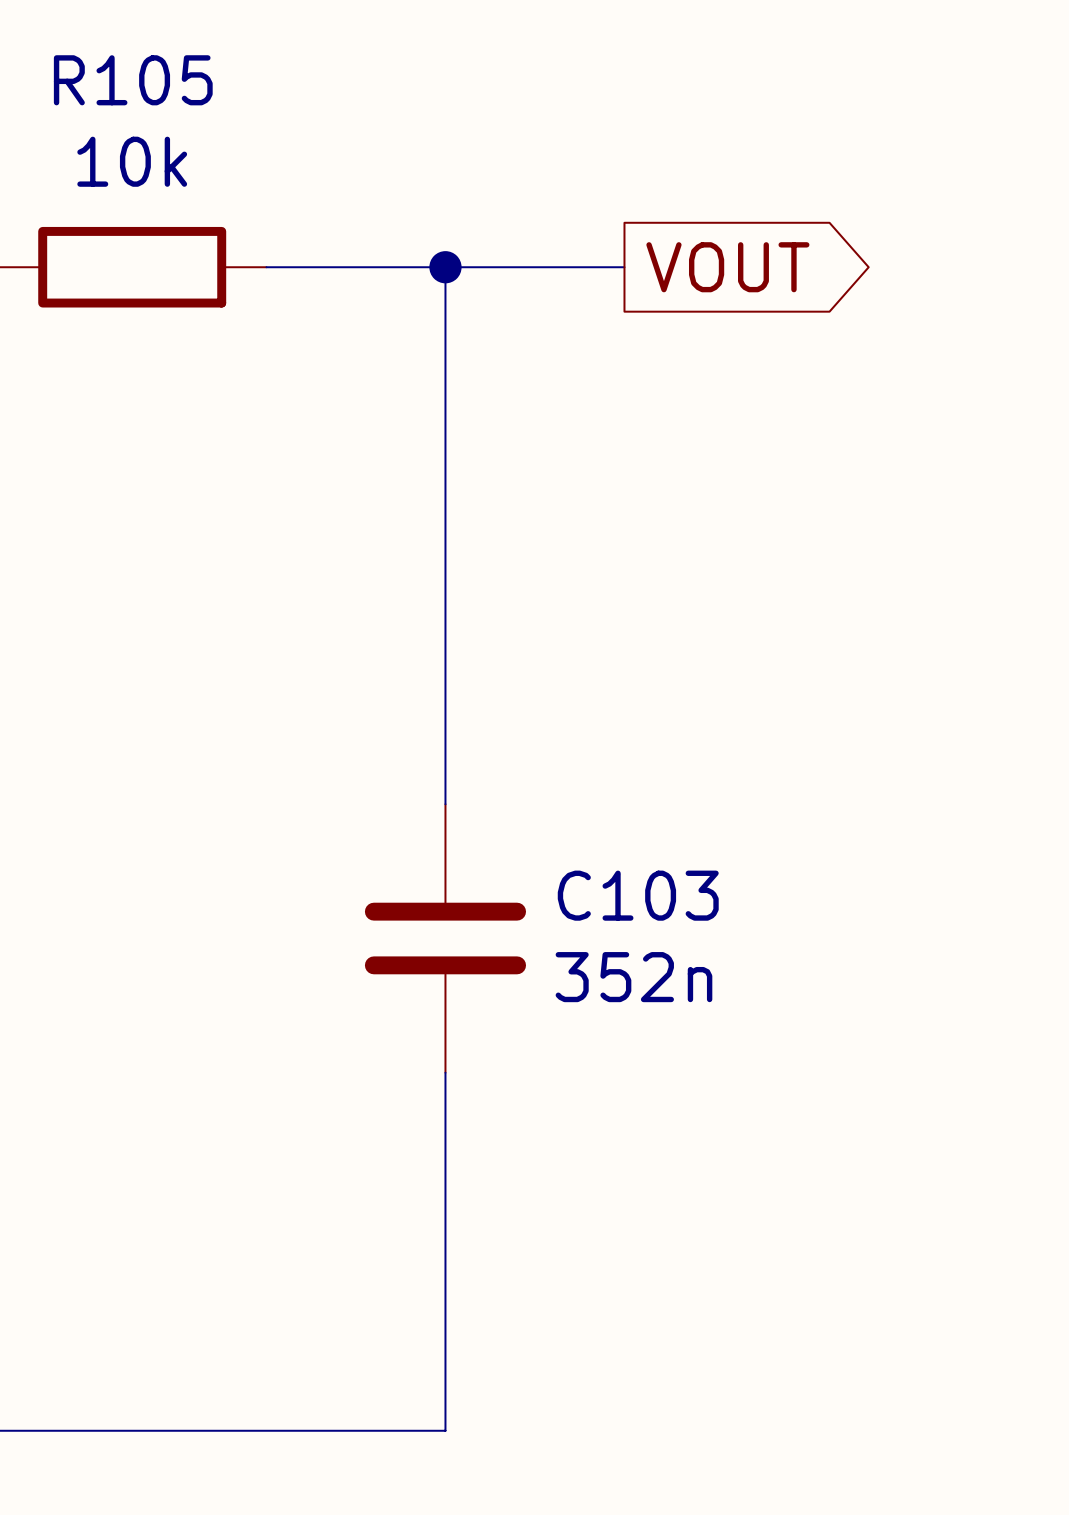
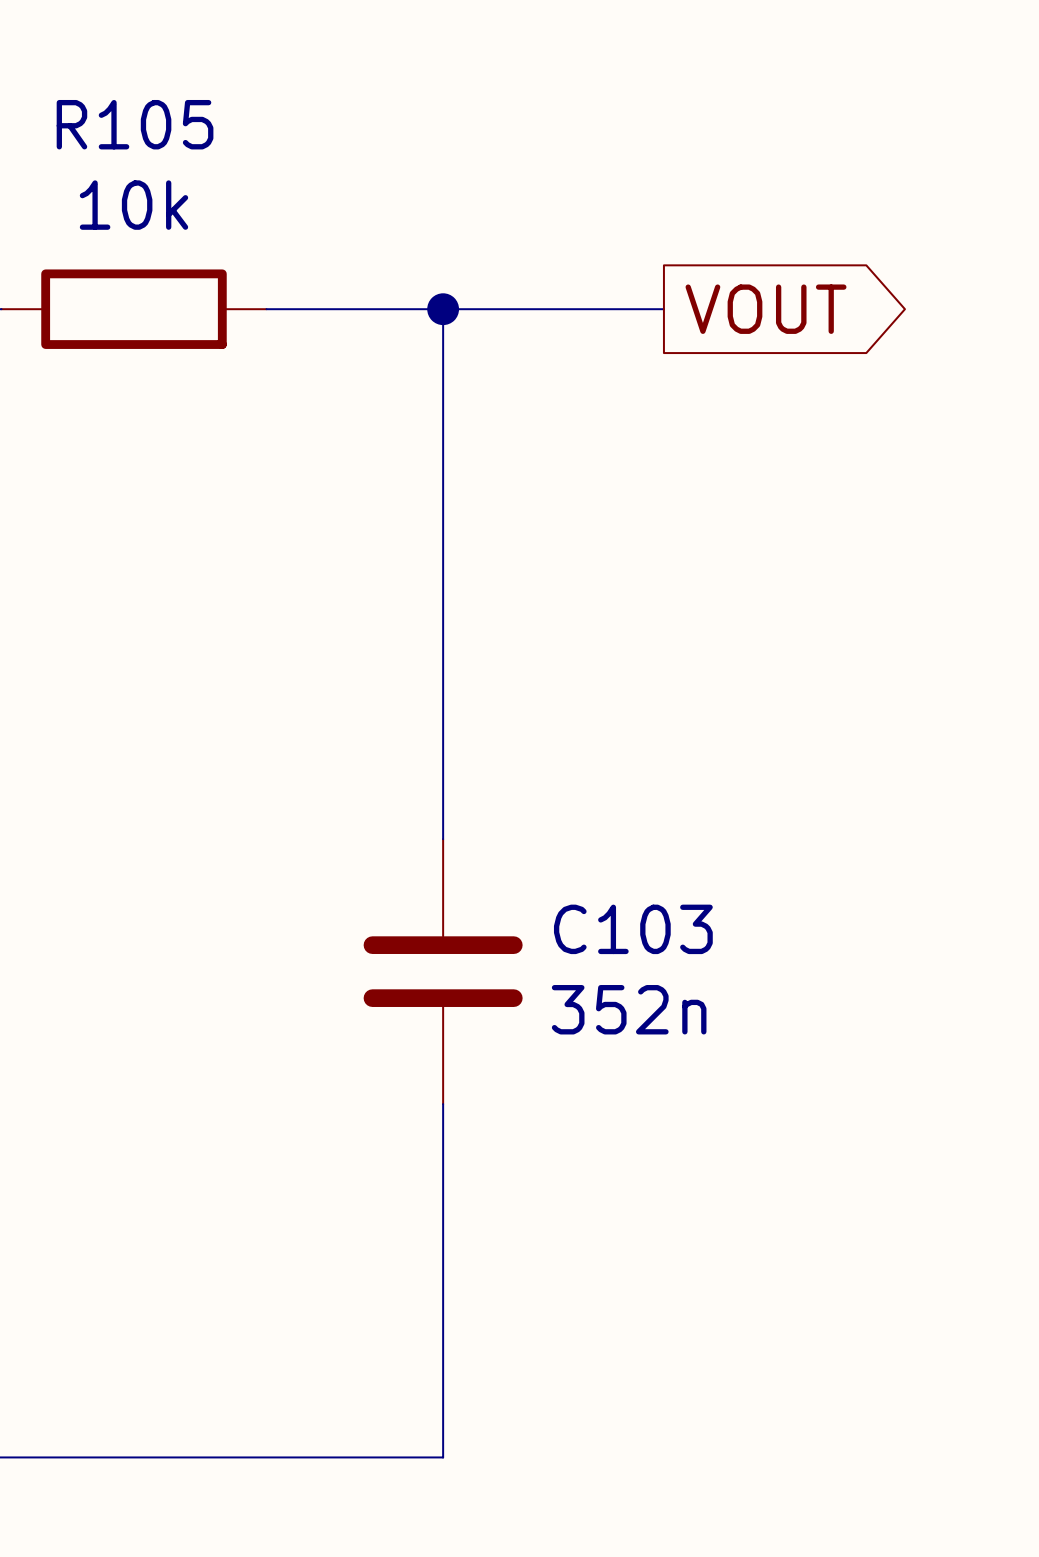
wire: none -> (619, 309) (663, 309)
global label position: VOUT (727, 267) -> VOUT (766, 309)

